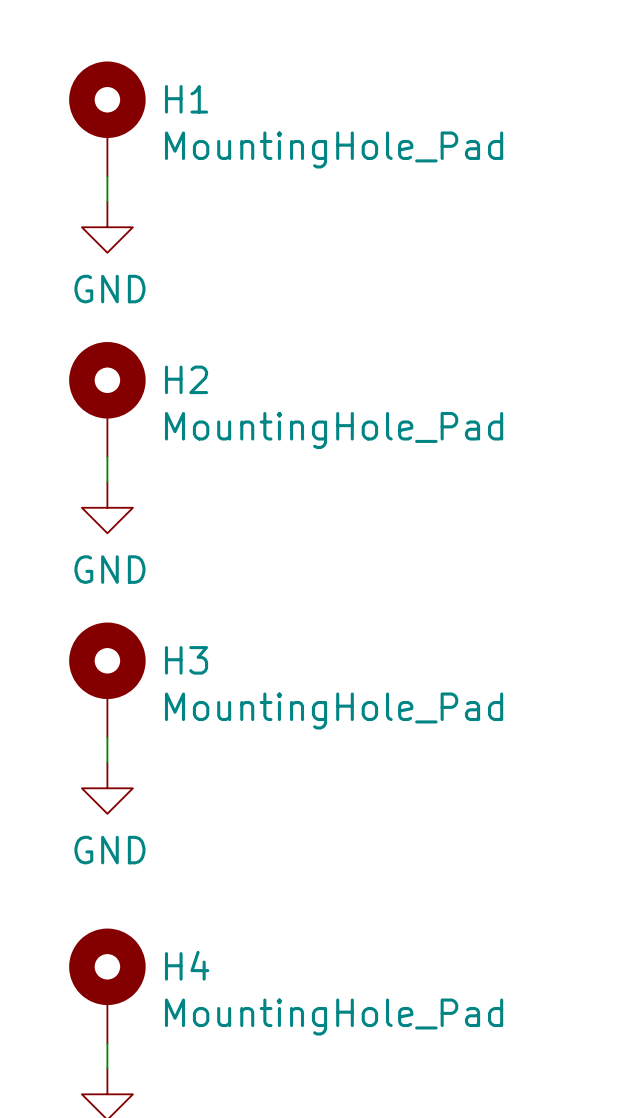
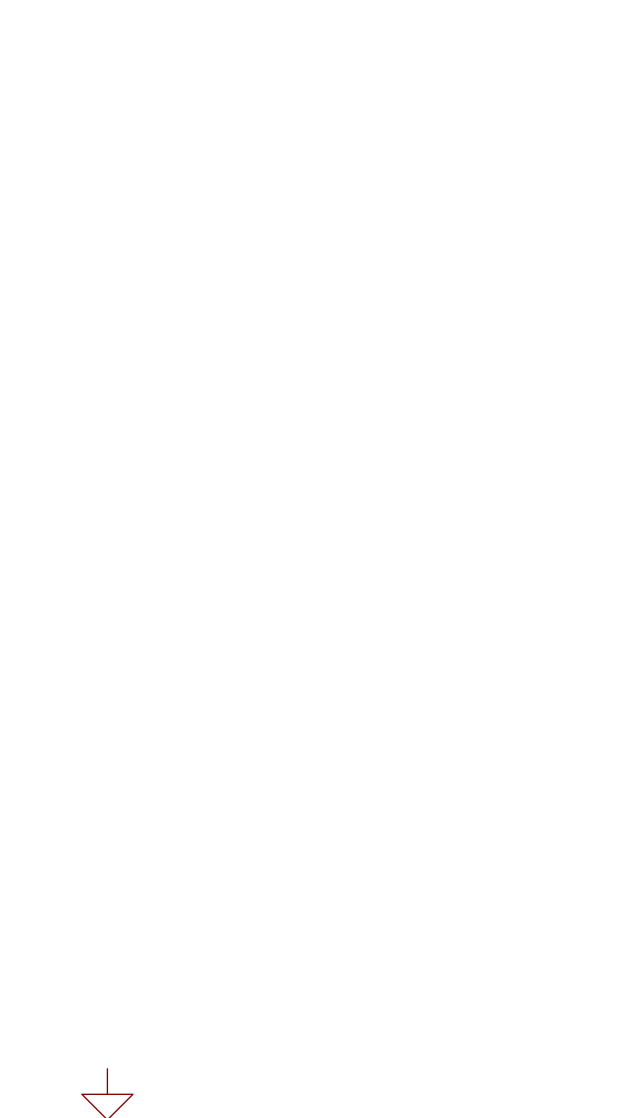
H1: MountingHole_Pad (107, 118) -> none
wire: (107, 176) (107, 201) -> none
power symbol: GND (107, 227) -> none
H2: MountingHole_Pad (107, 399) -> none
wire: (107, 456) (107, 482) -> none
power symbol: GND (107, 507) -> none
H3: MountingHole_Pad (107, 679) -> none
wire: (107, 737) (107, 762) -> none
power symbol: GND (107, 788) -> none
H4: MountingHole_Pad (107, 985) -> none
wire: (107, 1043) (107, 1068) -> none

